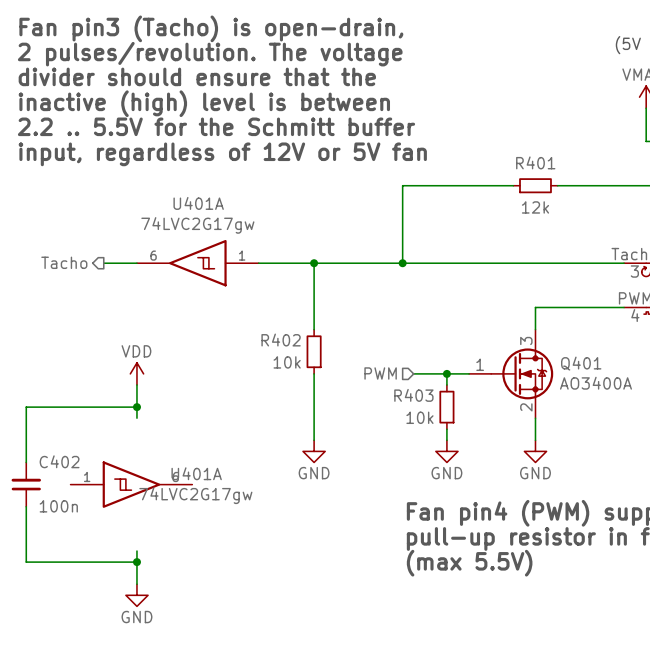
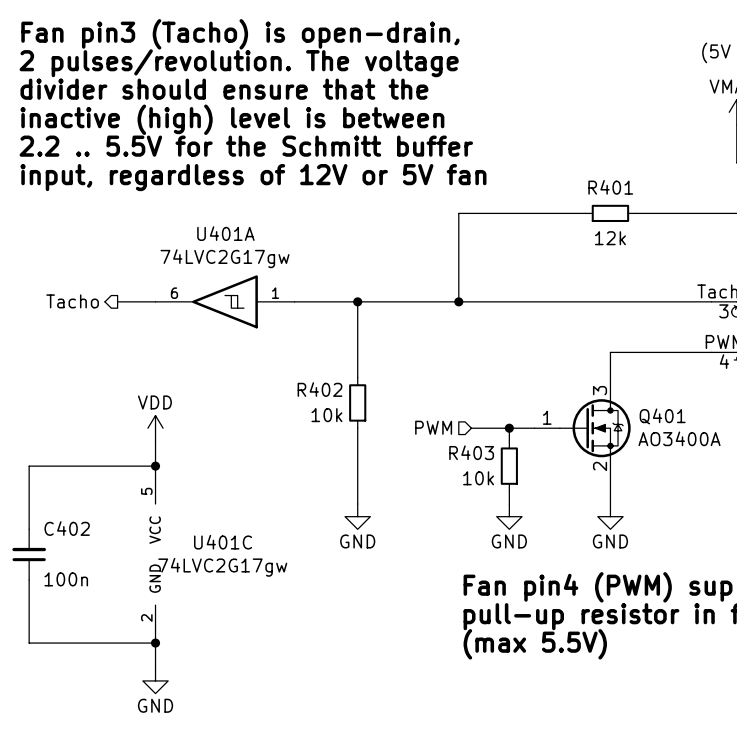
U401A: 74LVC2G17gw (131, 484) -> none
U401C: none -> 74LVC2G17gw (155, 554)

